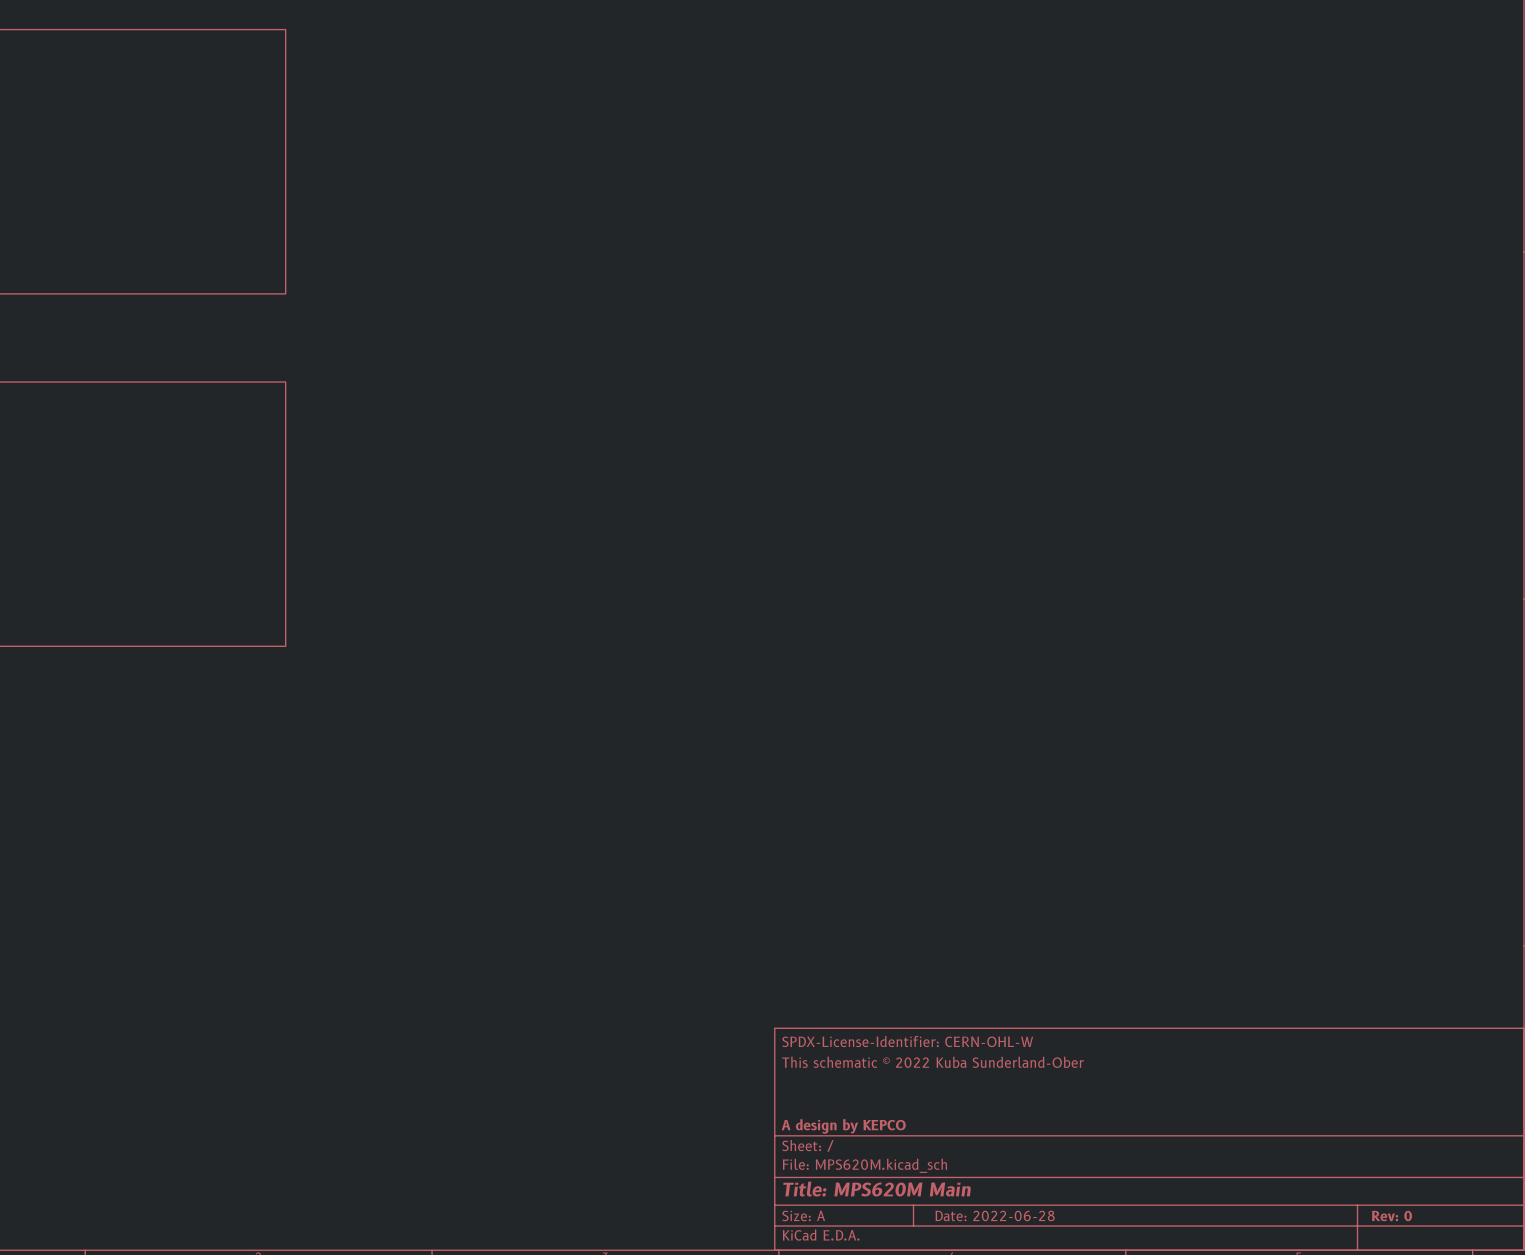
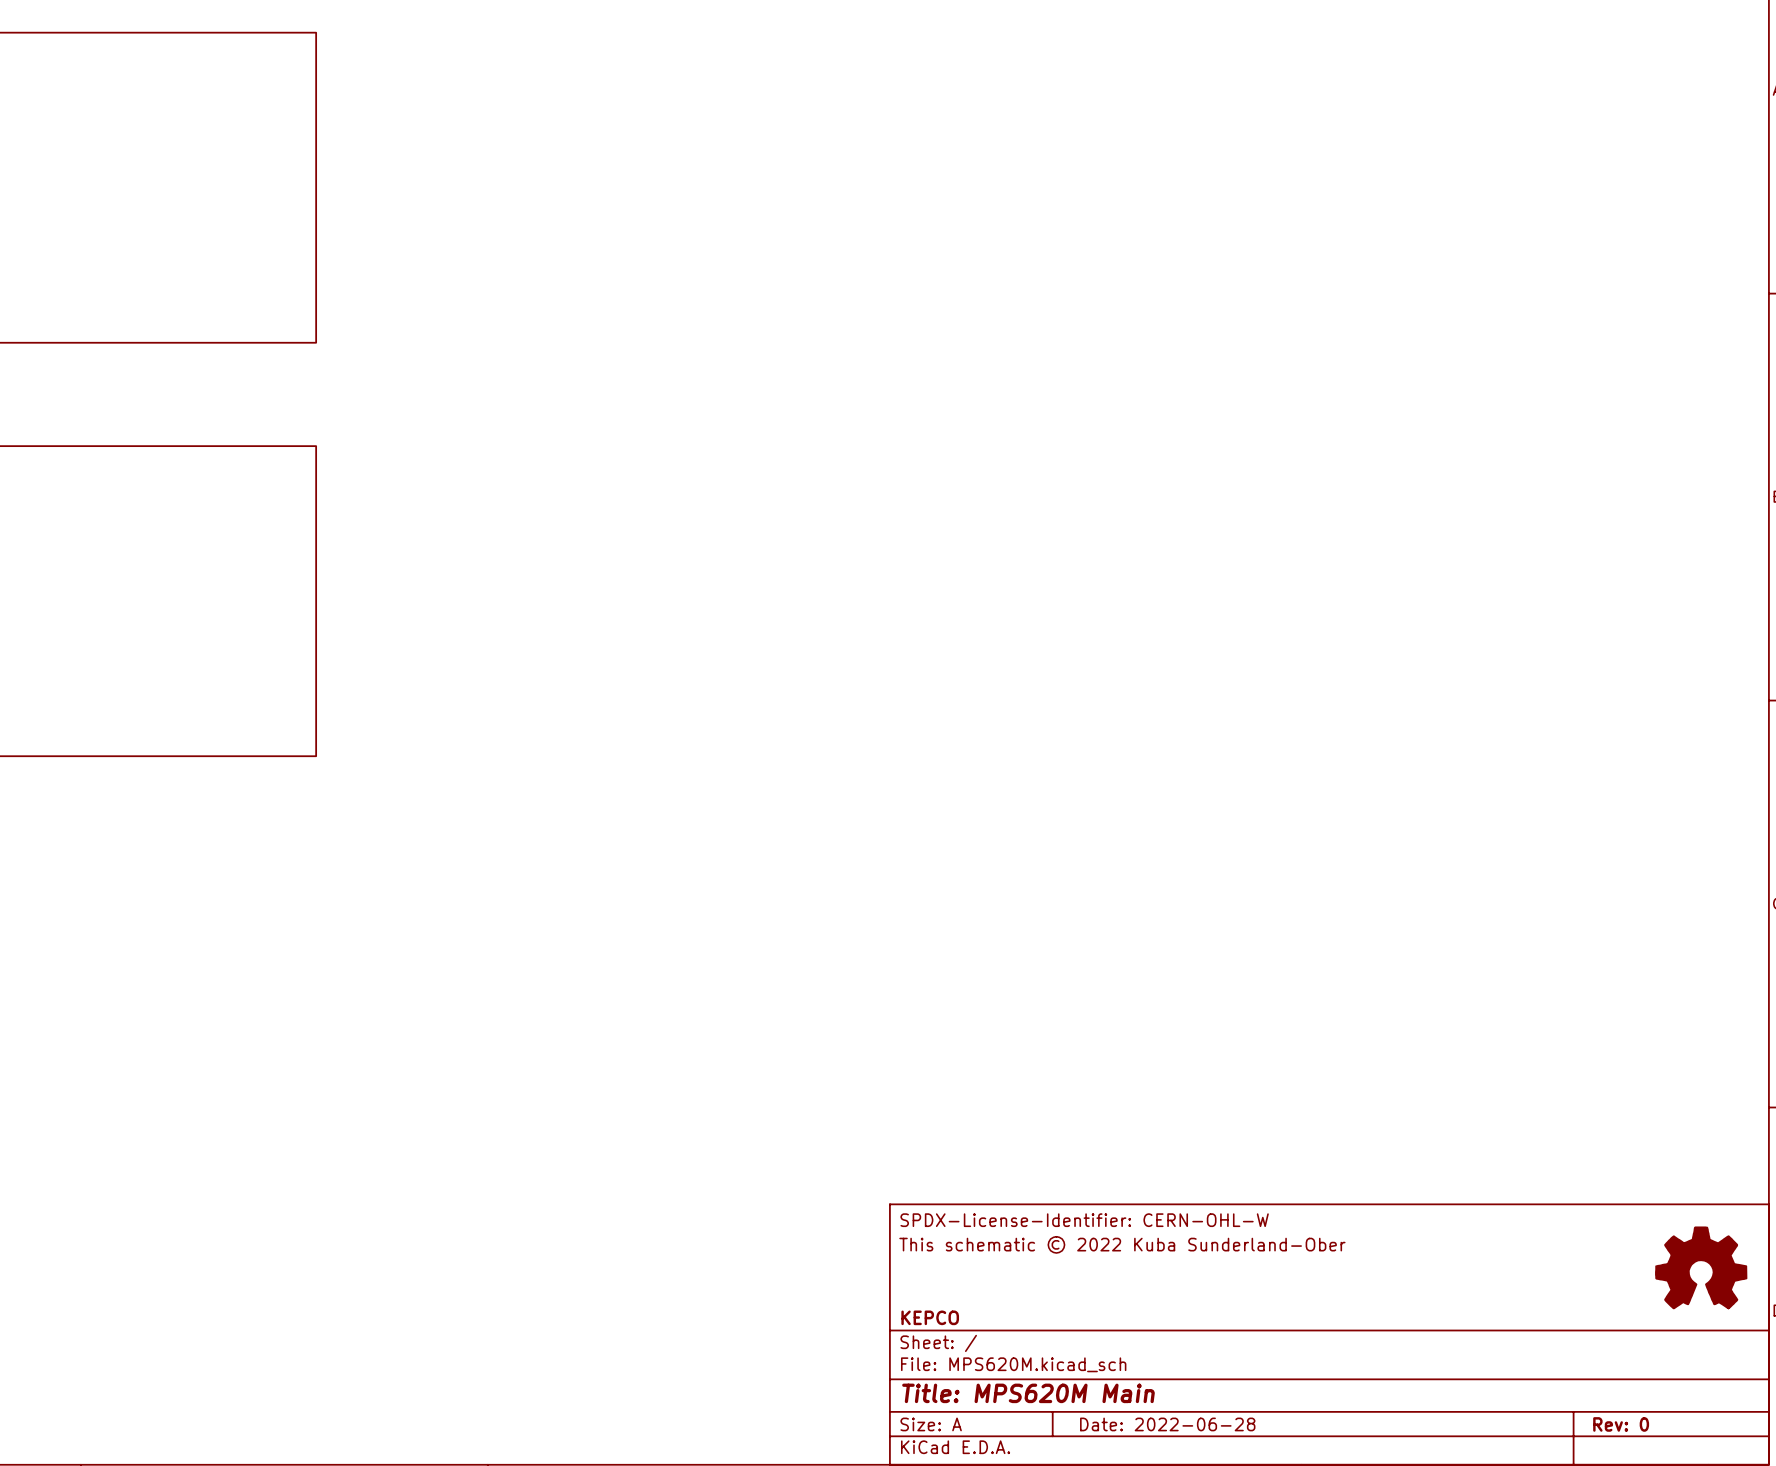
power symbol: none -> (1701, 1267)
title block: A design by KEPCO (843, 1126) -> KEPCO (930, 1317)

